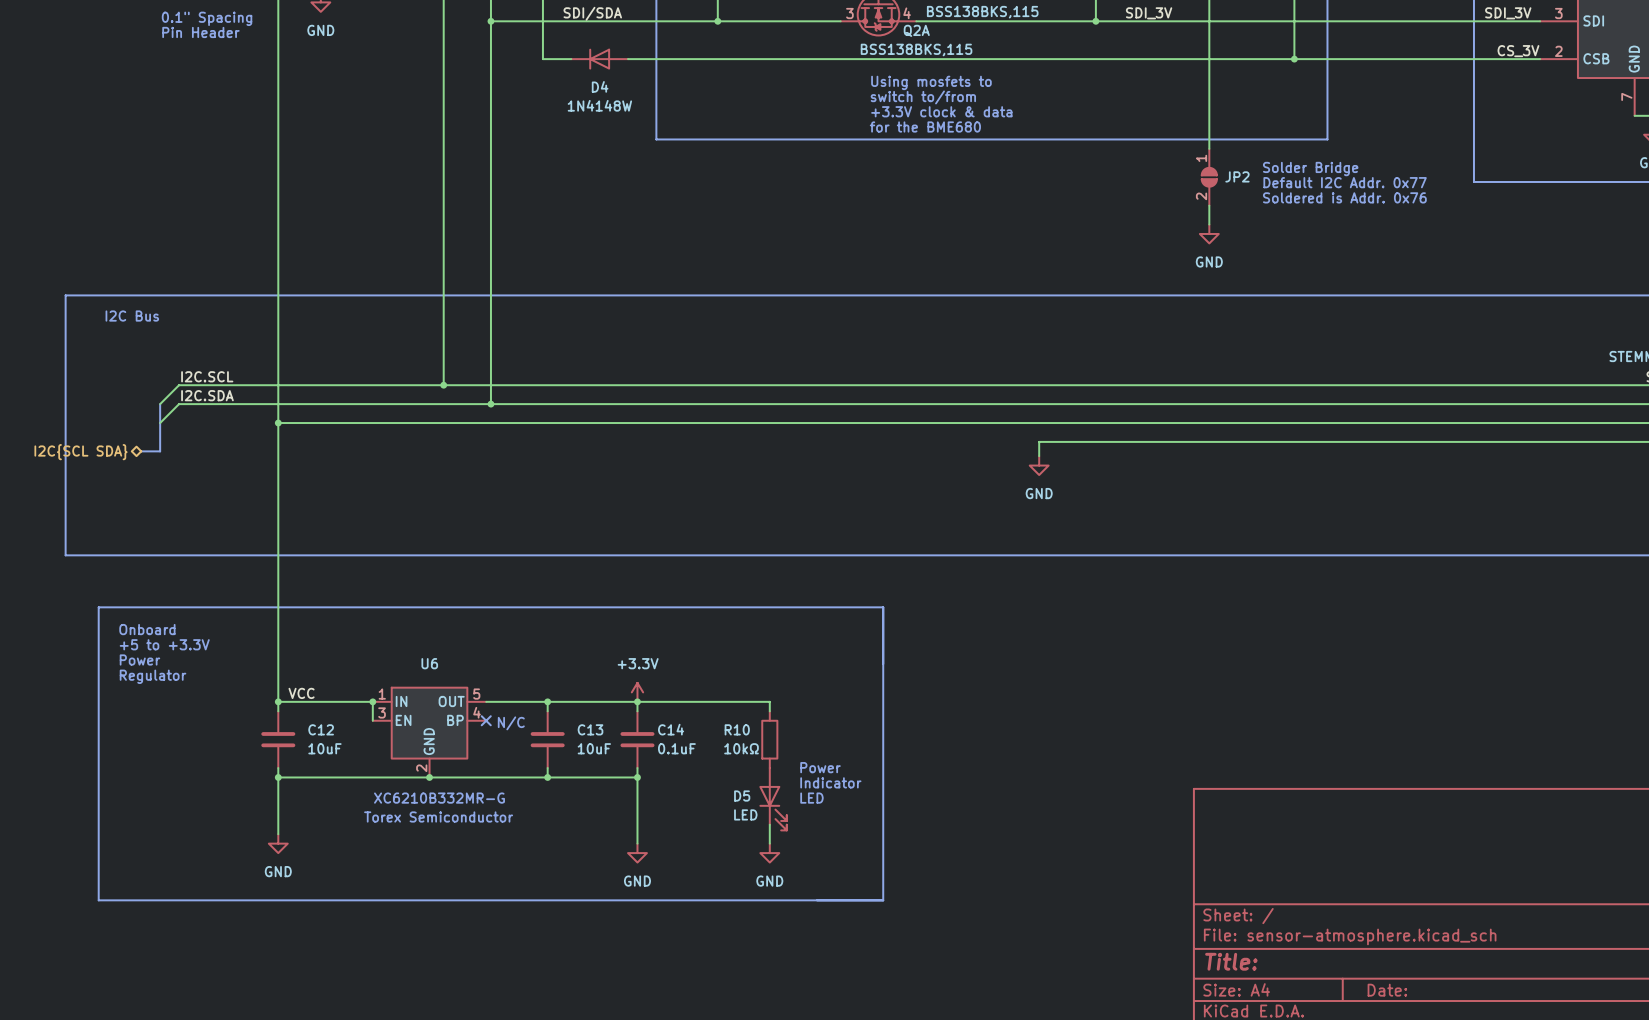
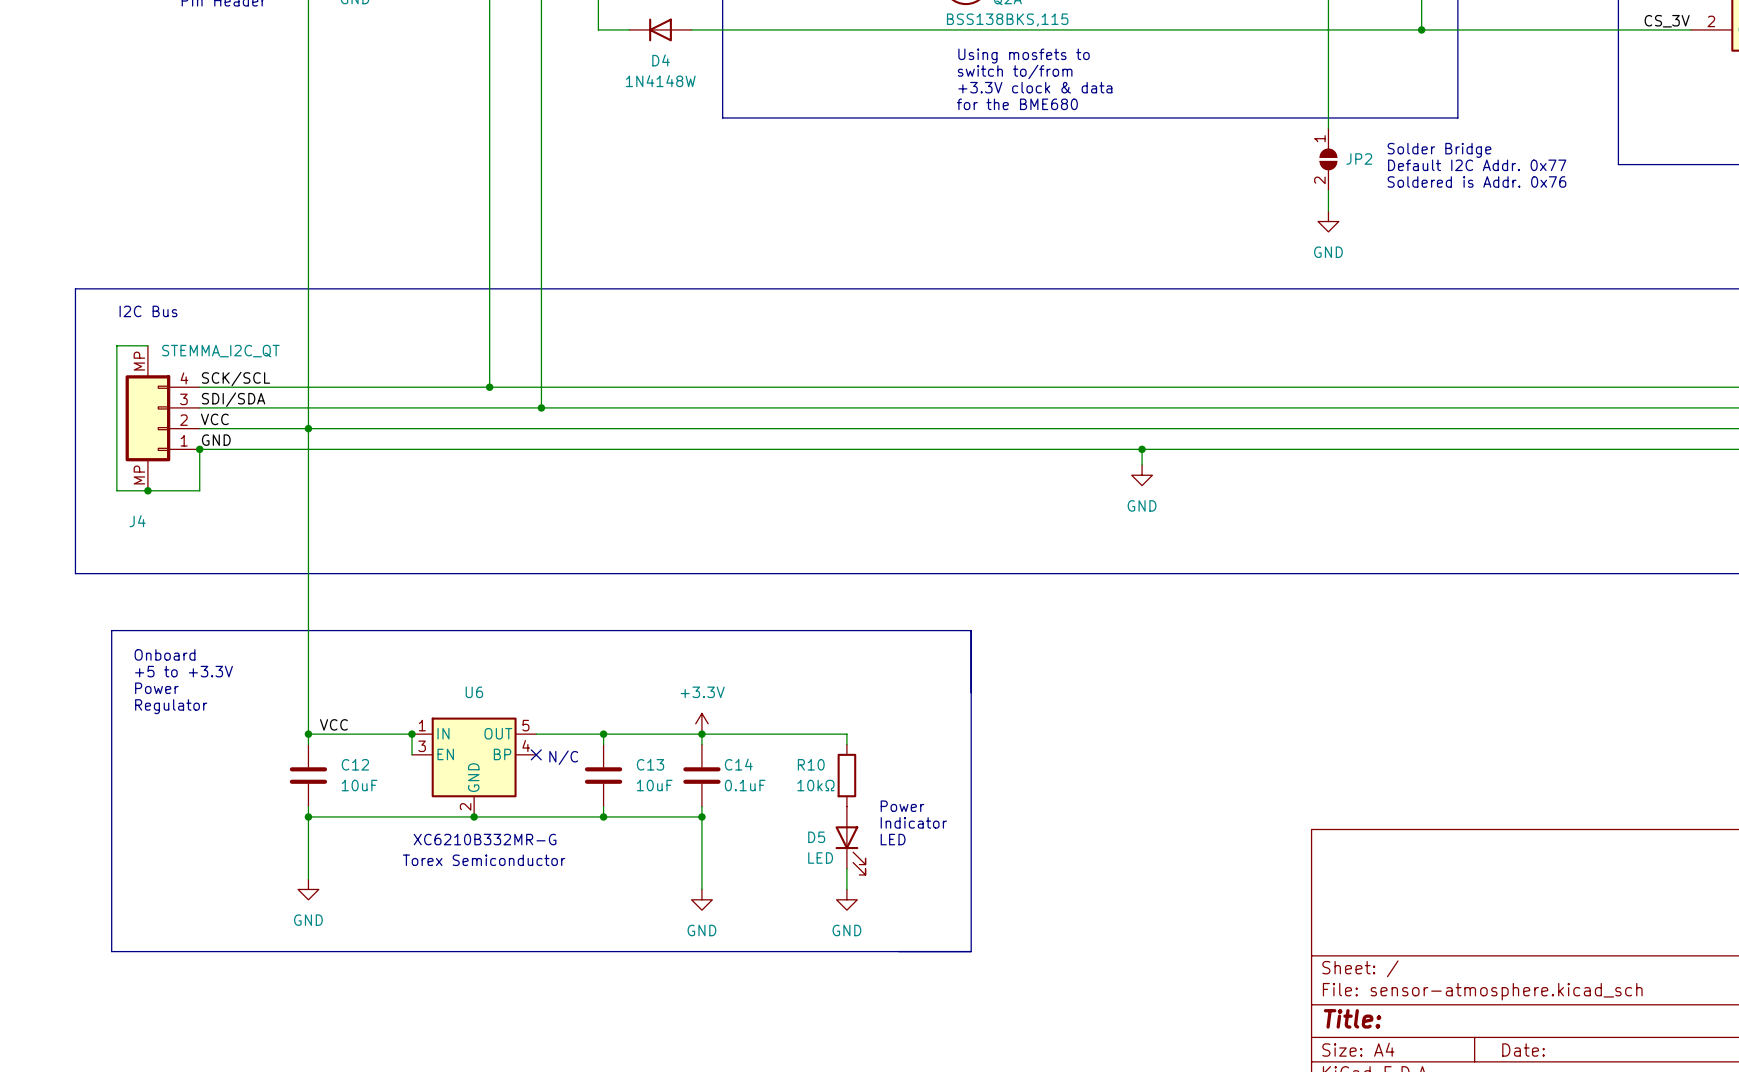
wire: none -> (147, 345) (116, 345) (116, 490) (199, 490) (199, 449) (1142, 449)
label: I2C.SCL (207, 376) -> SCK/SCL (236, 378)
wire: (179, 385) (160, 404) -> none
label: I2C.SDA (207, 395) -> SDI/SDA (233, 399)
bus: (160, 404) (160, 451) (141, 451) -> none
wire: (179, 404) (160, 423) -> none
J4: none -> STEMMA_I2C_QT (162, 418)
label: none -> VCC (214, 419)
wire: none -> (199, 428) (308, 428)
label: none -> GND (216, 440)
junction: none -> (199, 449)
junction: none -> (1142, 449)
hierarchical label: I2C{SCL SDA} (81, 452) -> none
junction: none -> (147, 490)

